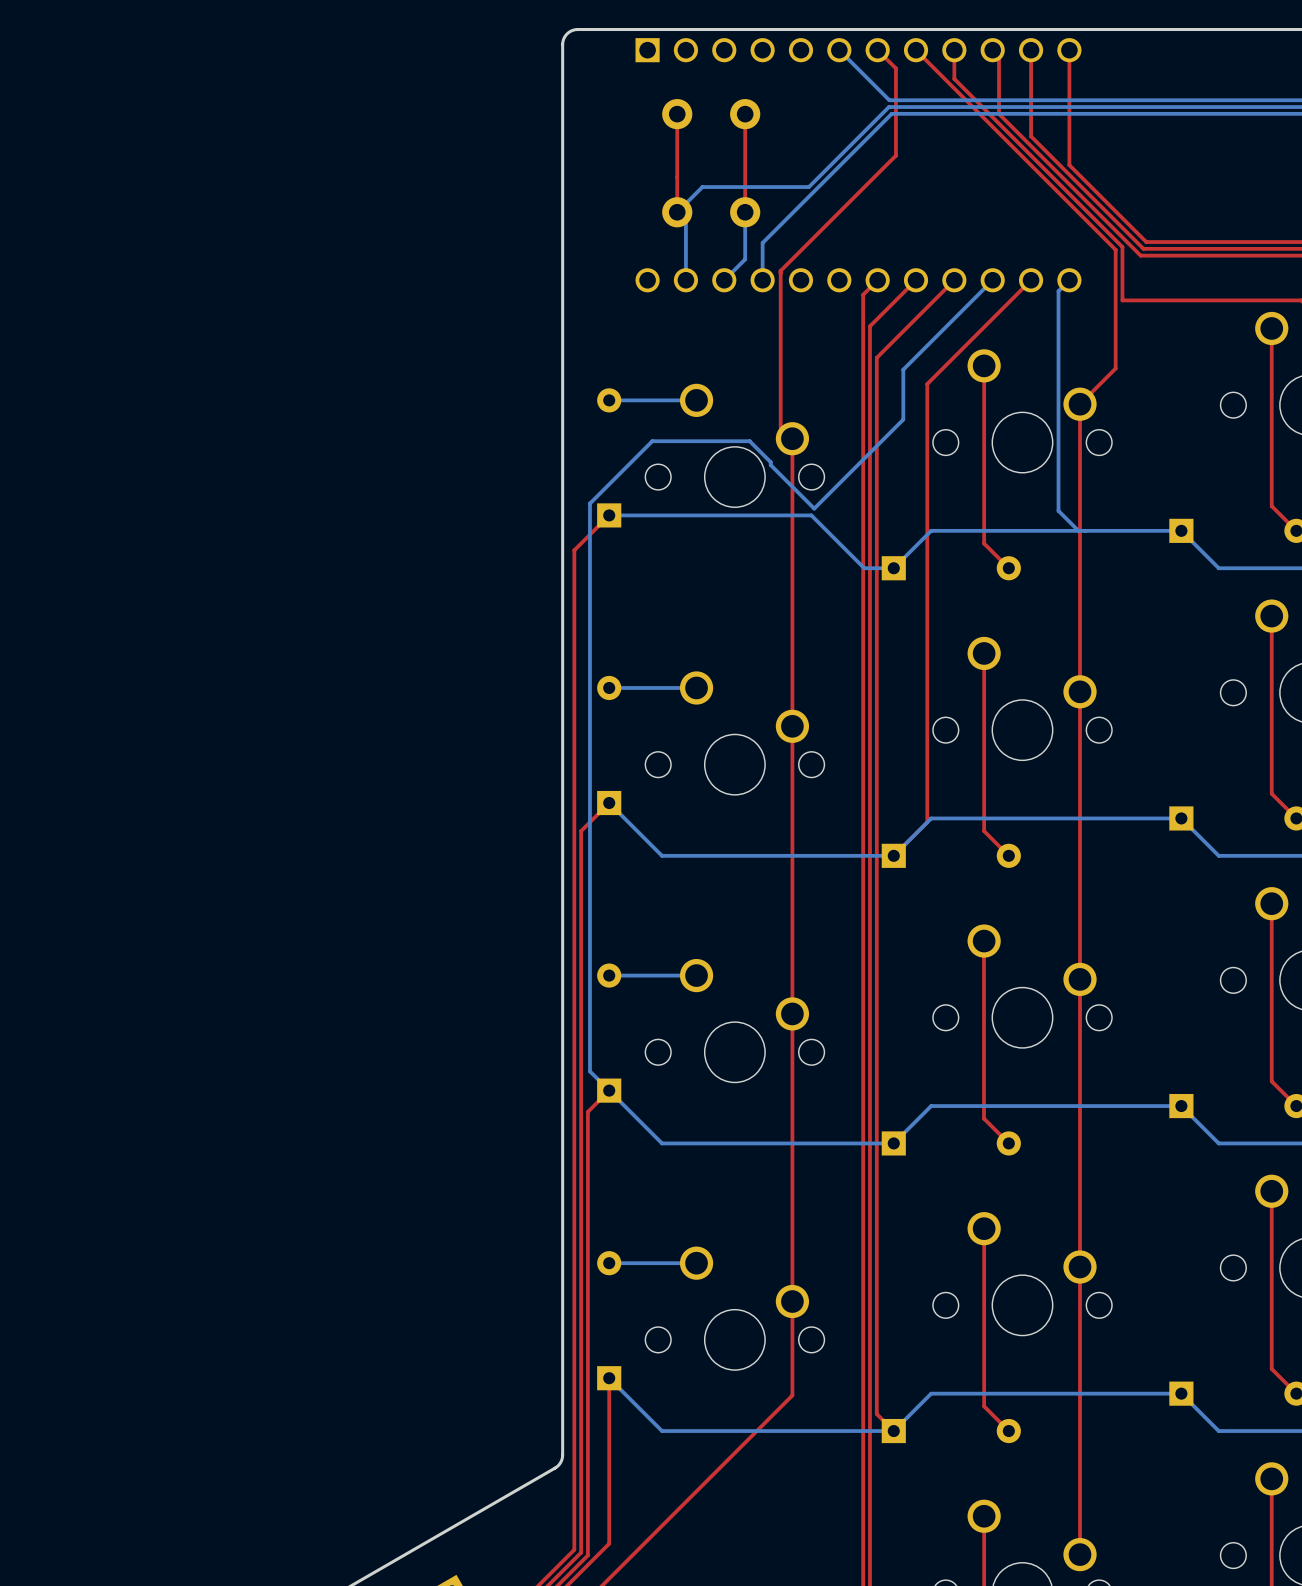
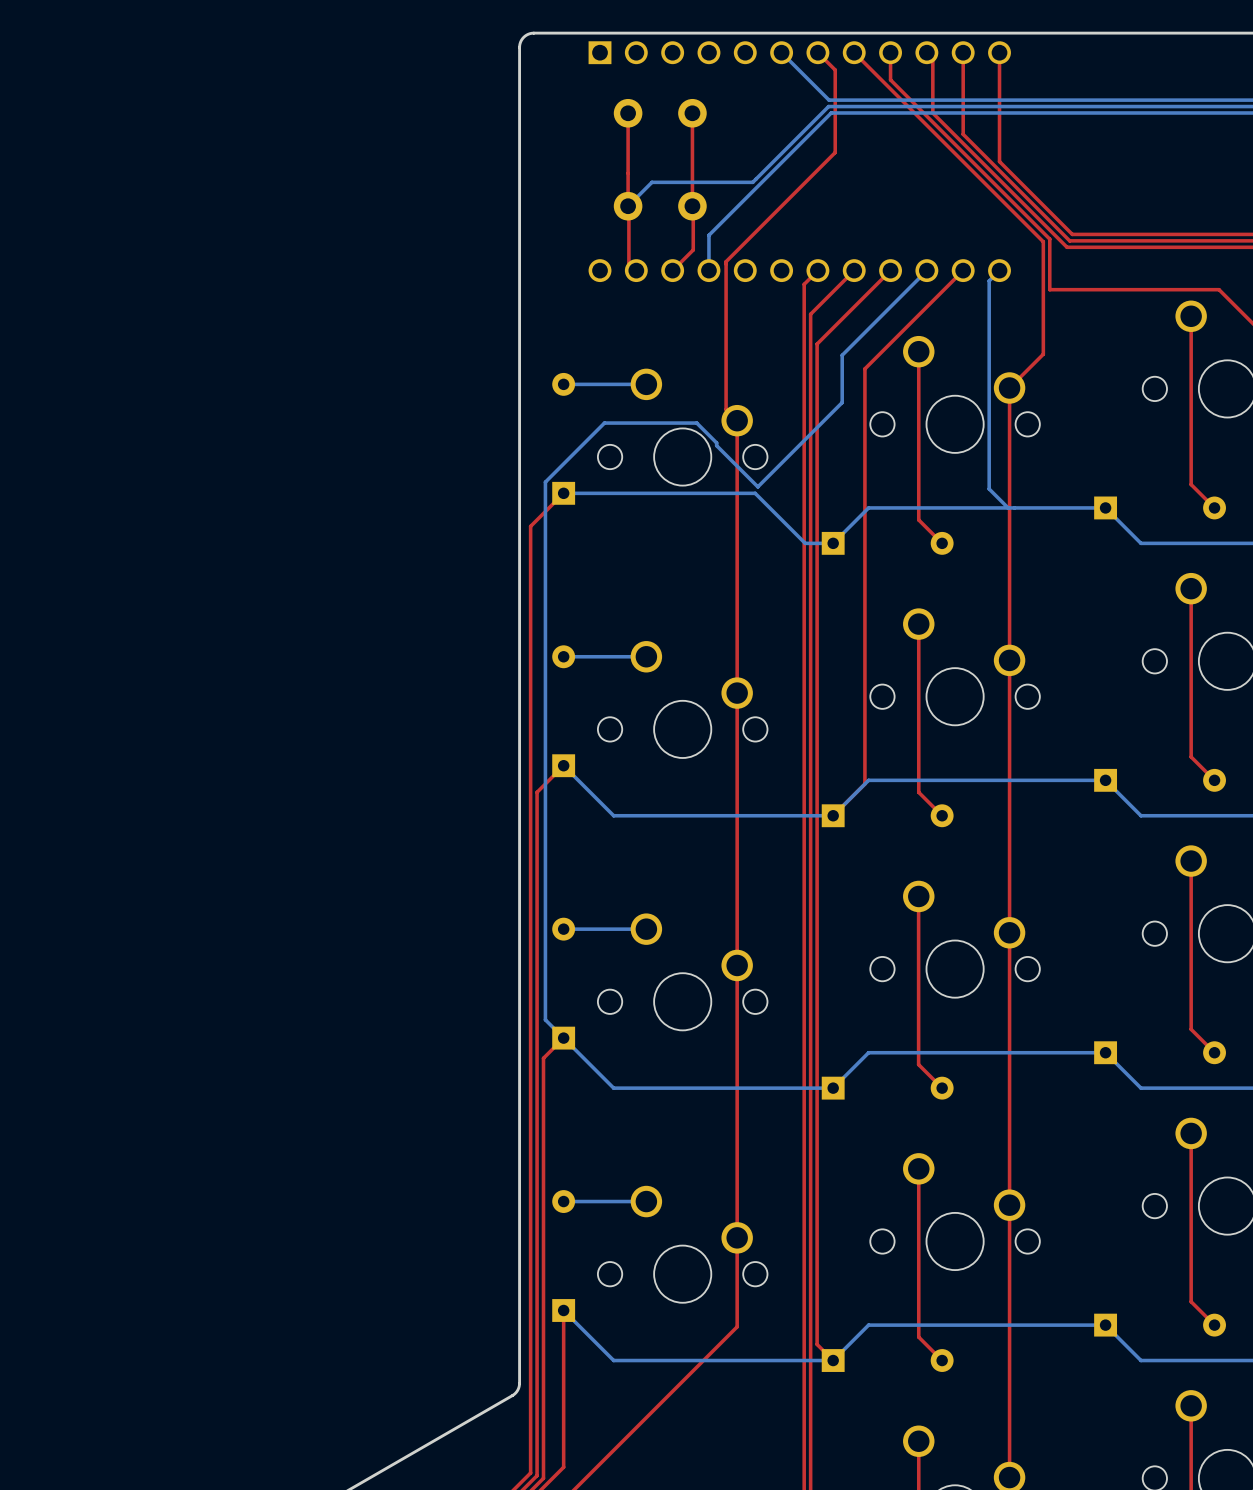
top track: none -> (628, 202) (628, 263) (636, 270)
top track: none -> (693, 202) (693, 250) (672, 270)
bottom track: (745, 212) (745, 259) (724, 280) -> none
bottom track: (685, 220) (685, 280) -> none

